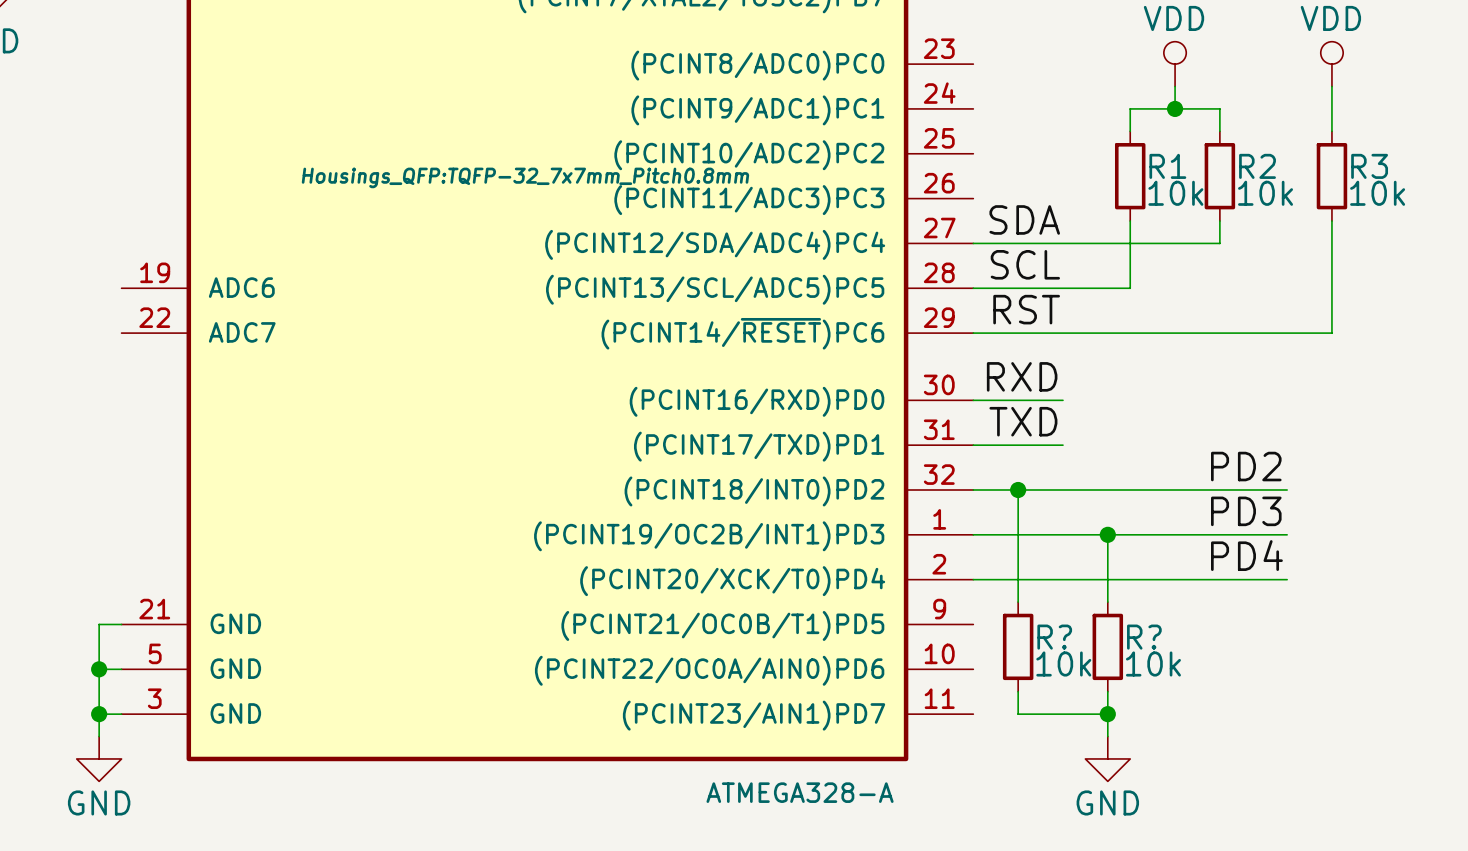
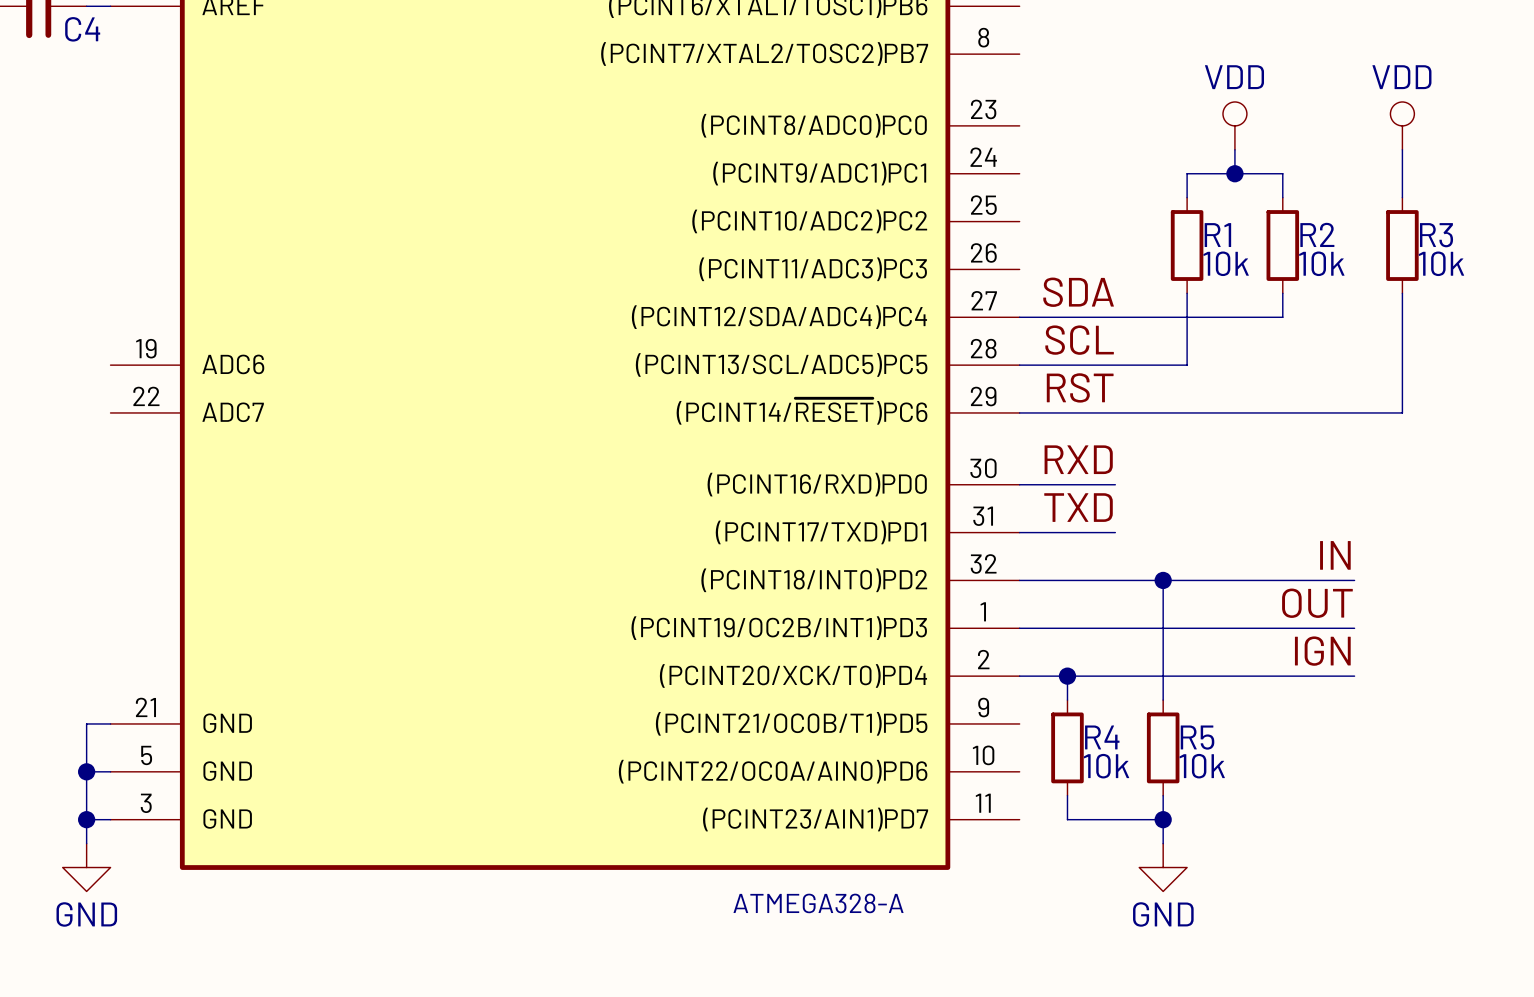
part text: Housings_QFP:TQFP-32_7x7mm_Pitch0.8mm (525, 177) -> none
label: PD2 (1246, 466) -> IN (1335, 555)
wire: (1018, 489) (1018, 579) -> none
junction: (1018, 489) -> none
wire: none -> (1163, 580) (1163, 628)
junction: none -> (1163, 580)
label: PD3 (1246, 511) -> OUT (1317, 603)
junction: (1107, 534) -> none
label: PD4 (1246, 555) -> IGN (1322, 651)
junction: none -> (1067, 676)
R? name: R? (1054, 637) -> R4 (1102, 737)
R? name: R? (1144, 637) -> R5 (1197, 737)

